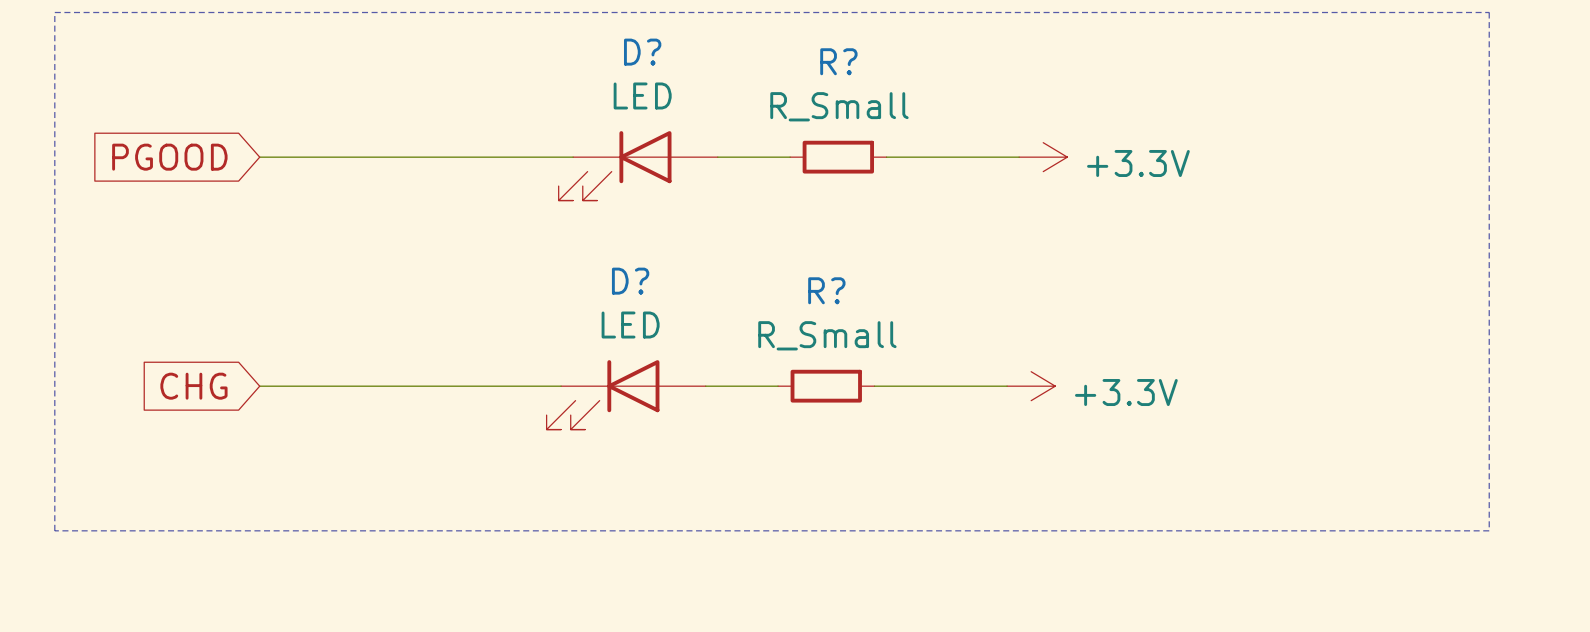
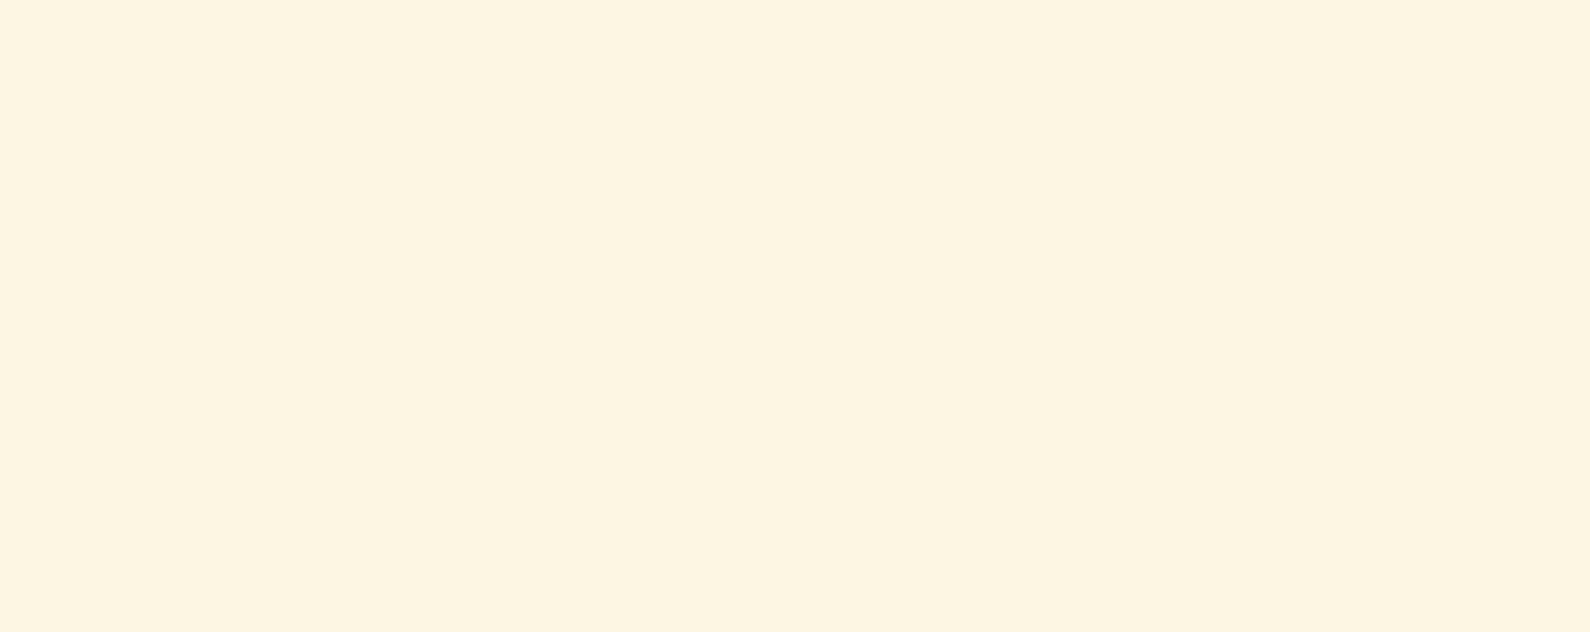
line: (54, 12) (54, 530) (1489, 530) (1489, 12) (54, 12) -> none
global label: PGOOD (169, 157) -> none
wire: (259, 157) (573, 157) -> none
wire: (717, 157) (790, 157) -> none
R?: R_Small (838, 157) -> none
wire: (886, 157) (1019, 157) -> none
power symbol: +3.3V (1043, 157) -> none
D?: LED (638, 165) -> none
global label: CHG (193, 386) -> none
wire: (259, 386) (561, 386) -> none
wire: (705, 386) (778, 386) -> none
R?: R_Small (826, 386) -> none
wire: (874, 386) (1007, 386) -> none
power symbol: +3.3V (1031, 386) -> none
D?: LED (626, 394) -> none

